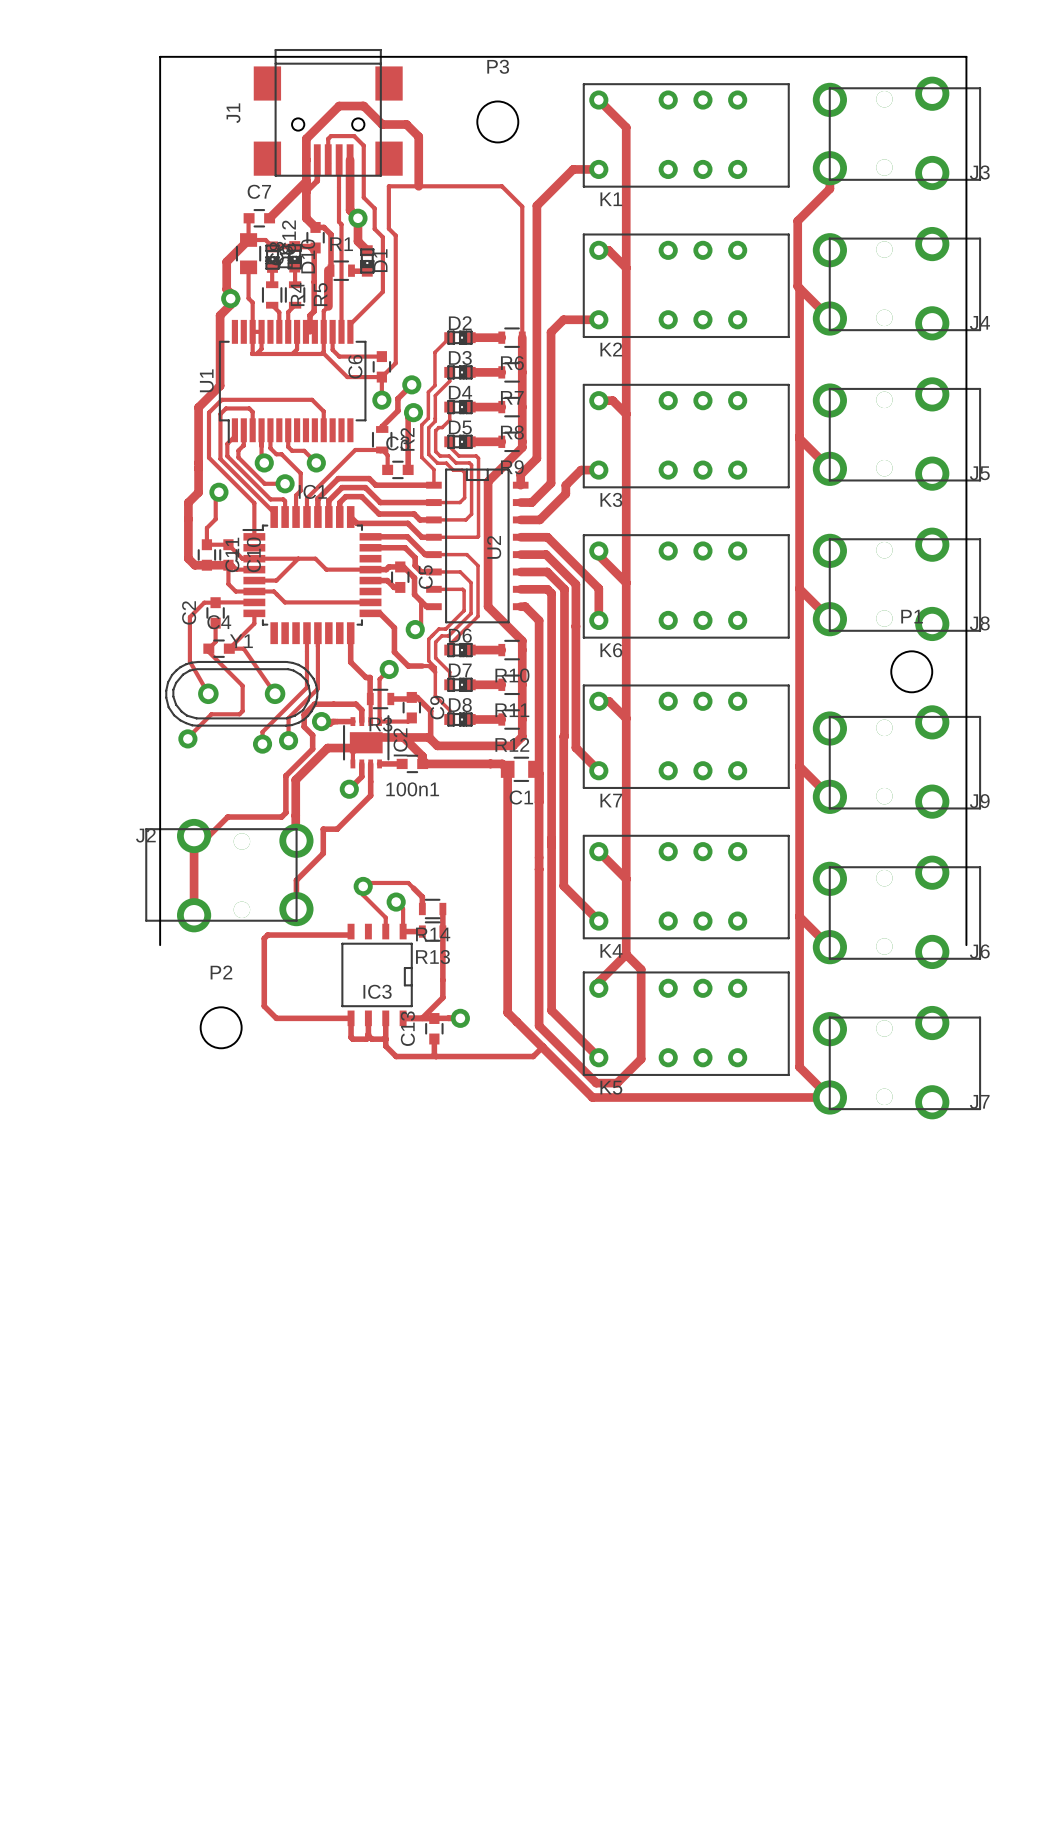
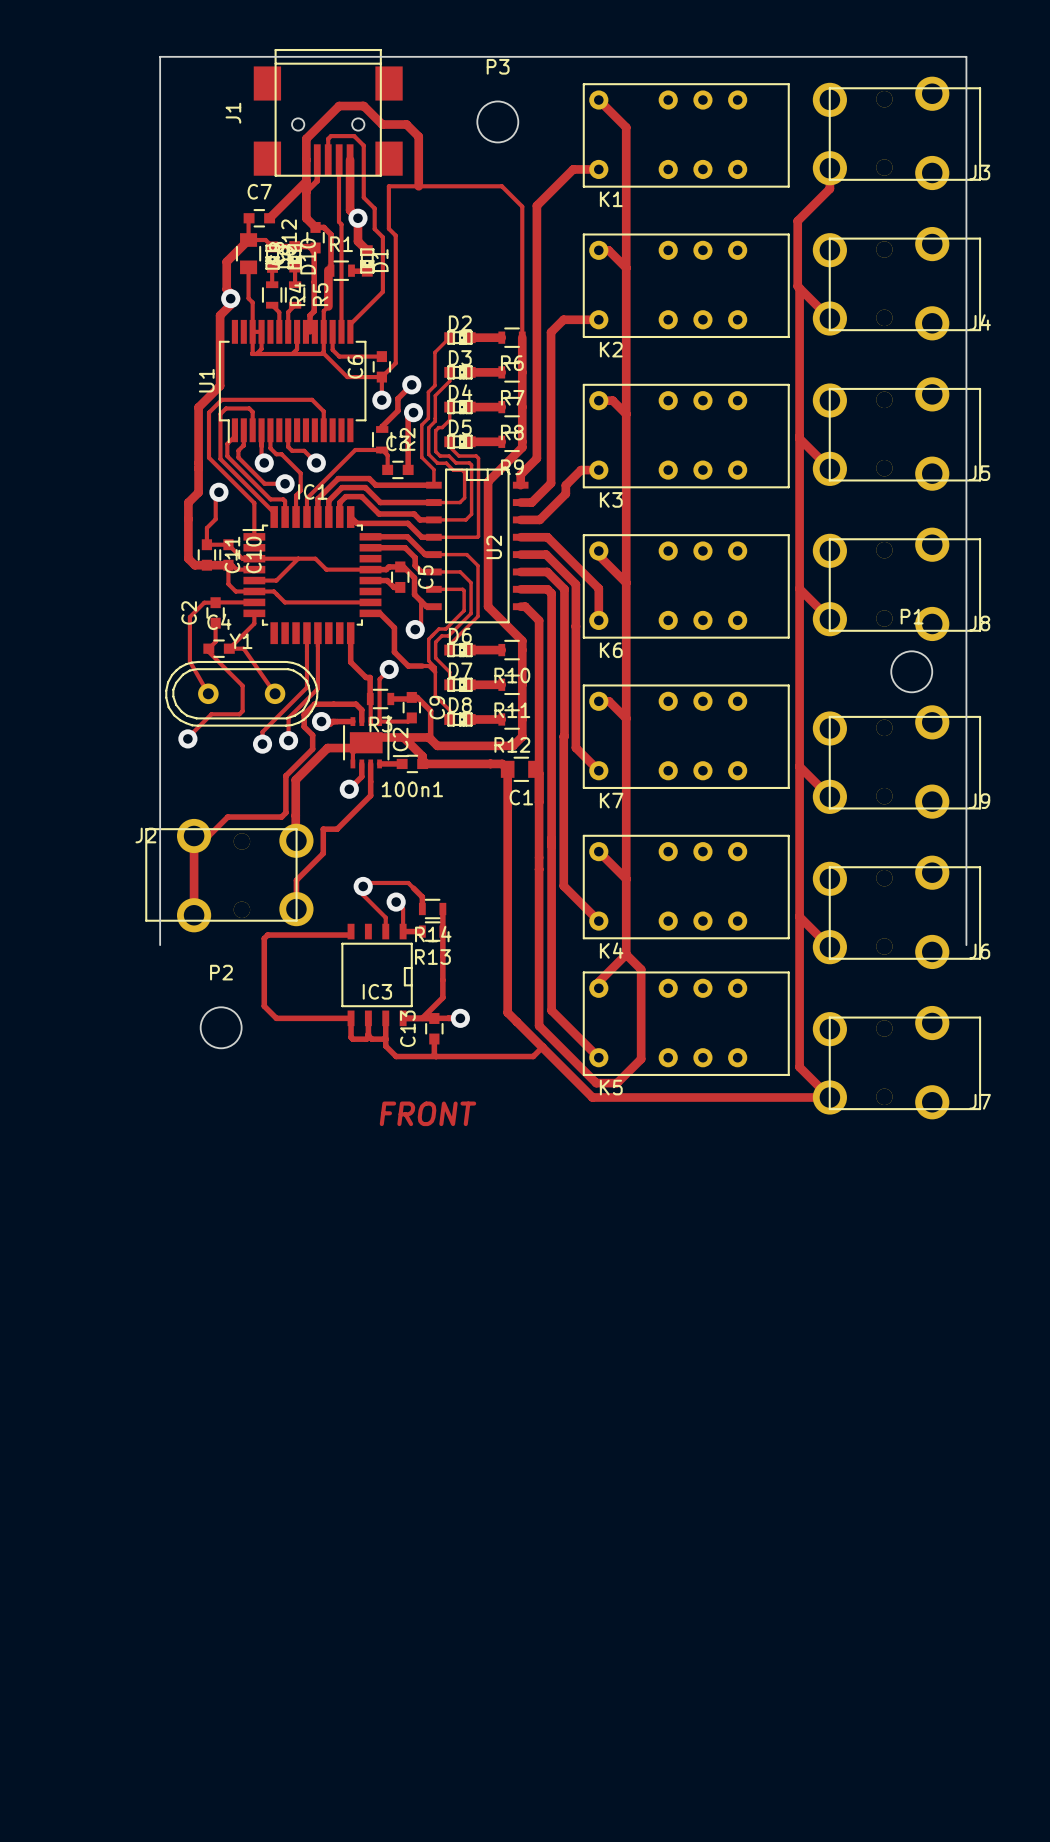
text: none -> FRONT (427, 1113)

